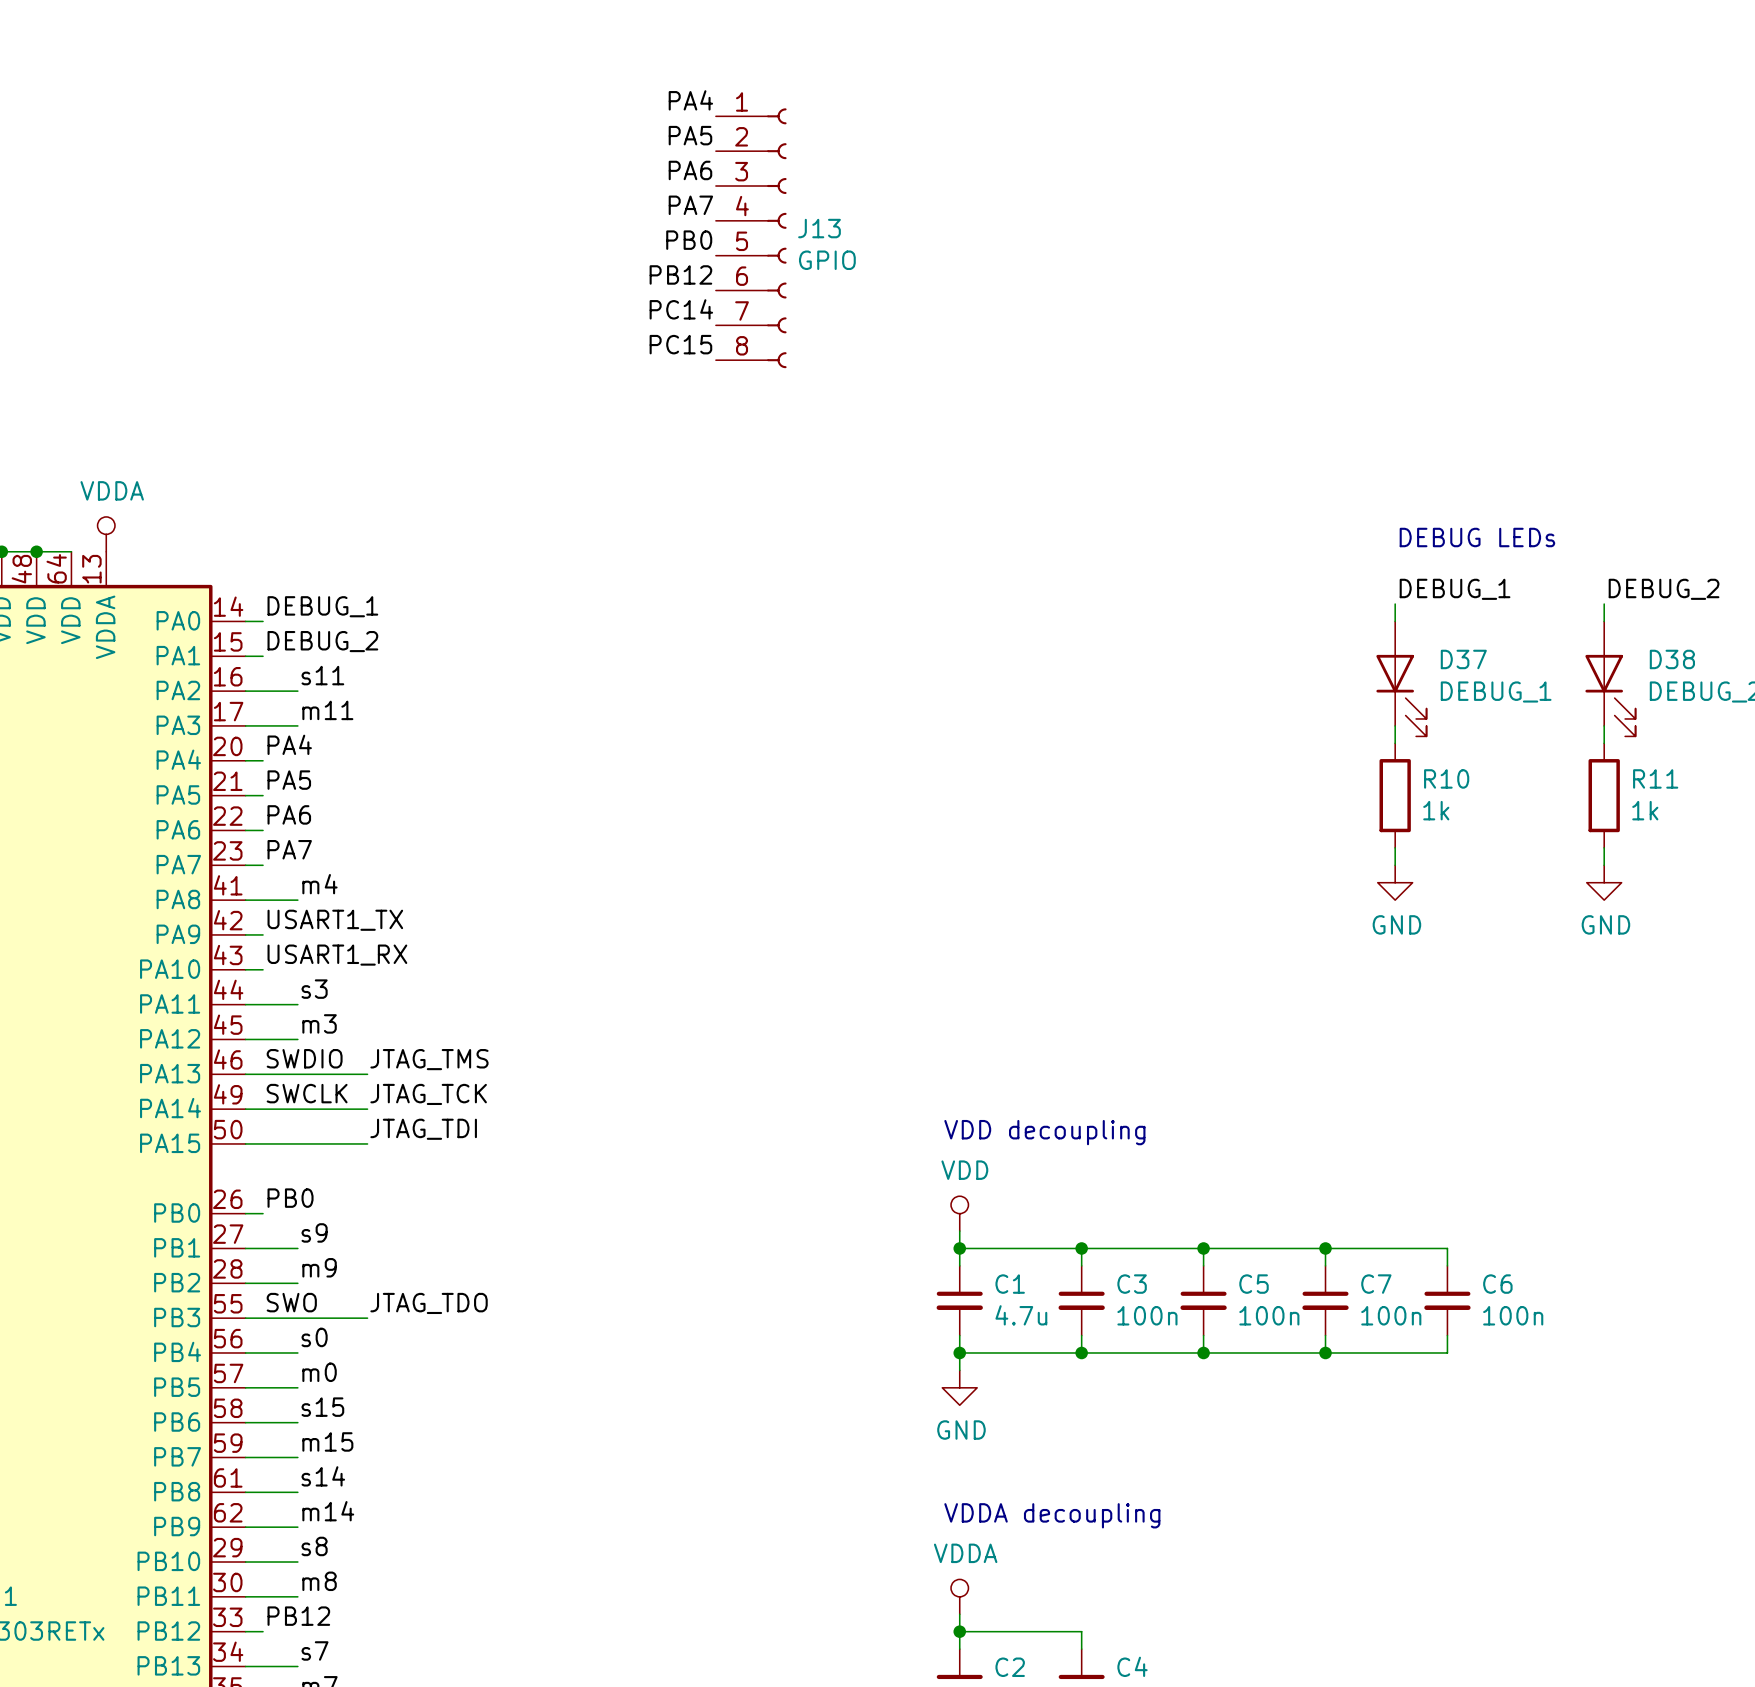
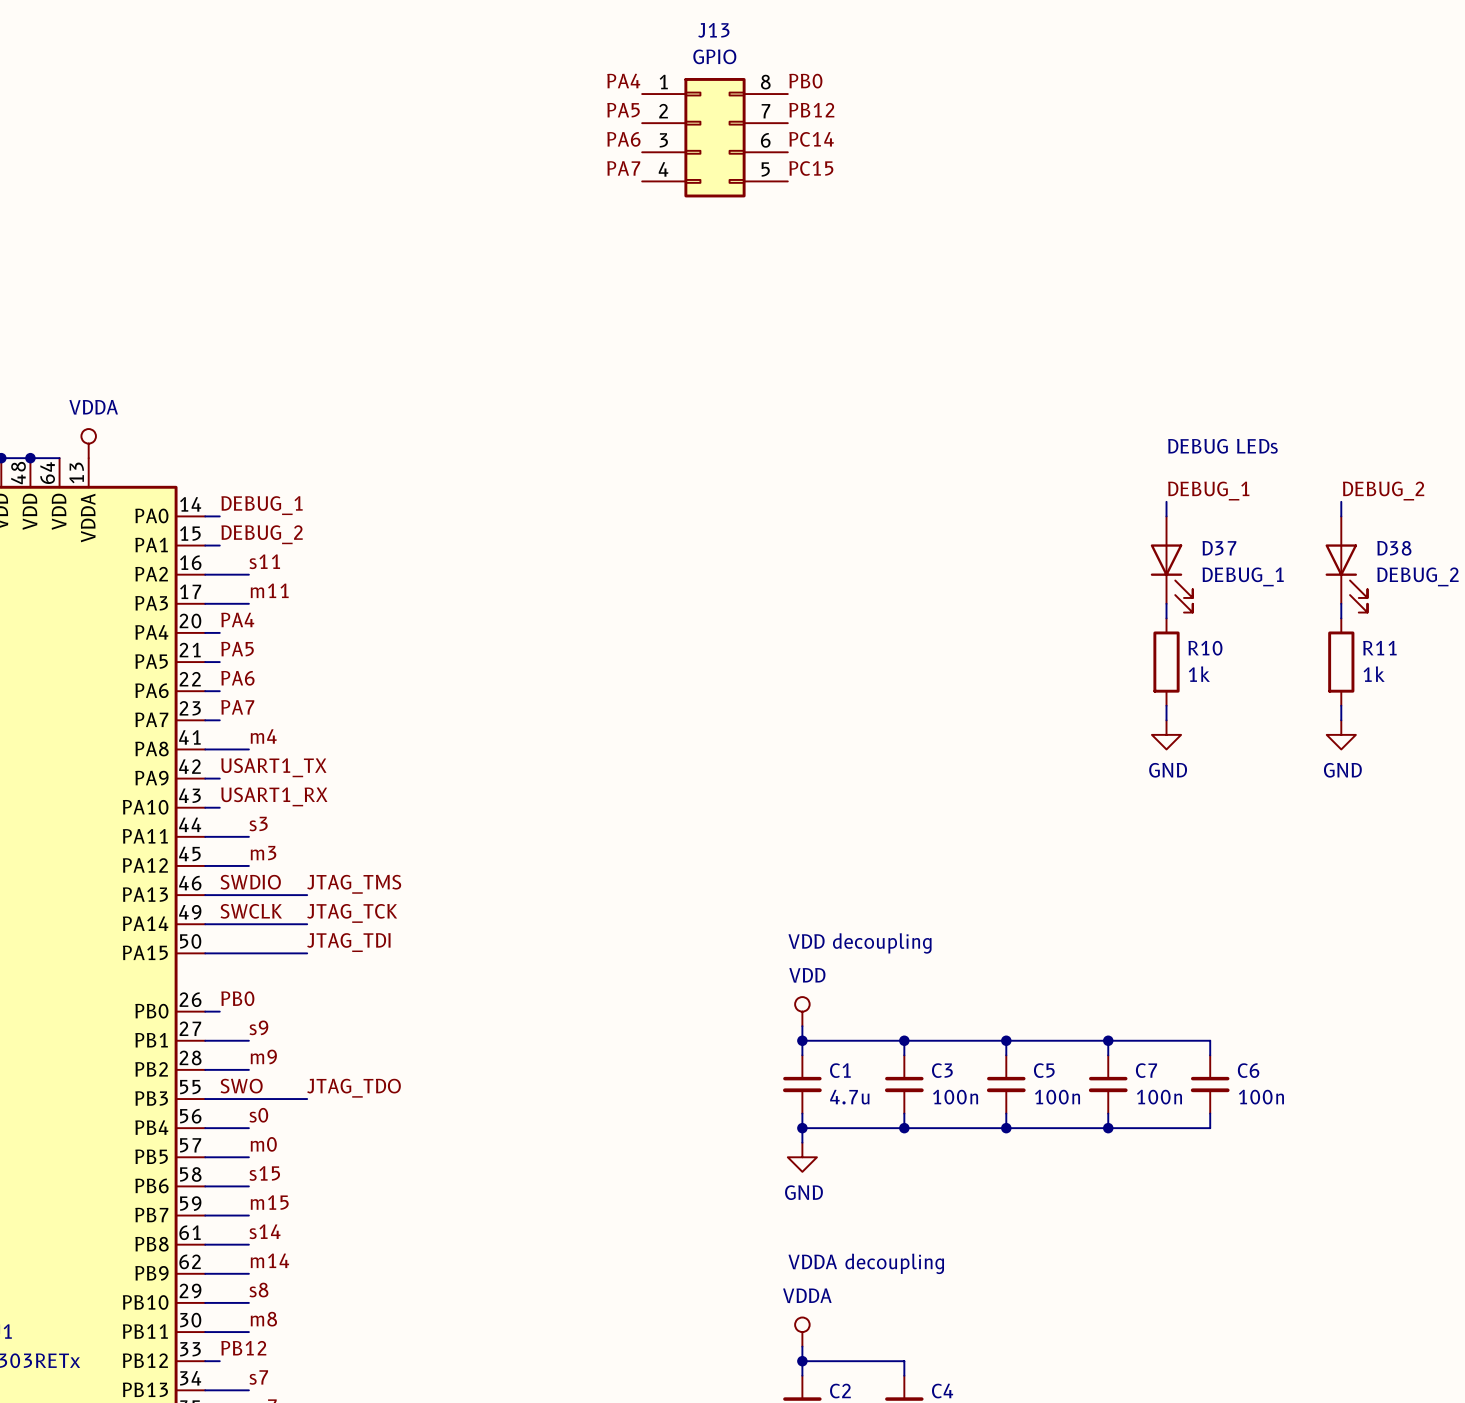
label position: PA4 (690, 100) -> PA4 (623, 81)
J13 symbol: [715, 108, 787, 369] -> [642, 78, 788, 198]
label position: PA5 (690, 135) -> PA5 (623, 110)
label position: PA6 (690, 170) -> PA6 (623, 139)
label position: PA7 (690, 205) -> PA7 (623, 168)
J13 name position: J13 (819, 228) -> J13 (713, 30)
label position: PB0 (689, 240) -> PB0 (805, 81)
J13 value position: GPIO (827, 260) -> GPIO (714, 56)
label position: PB12 (680, 274) -> PB12 (811, 110)
label position: PC14 (681, 309) -> PC14 (811, 139)
label position: PC15 (680, 344) -> PC15 (811, 168)

